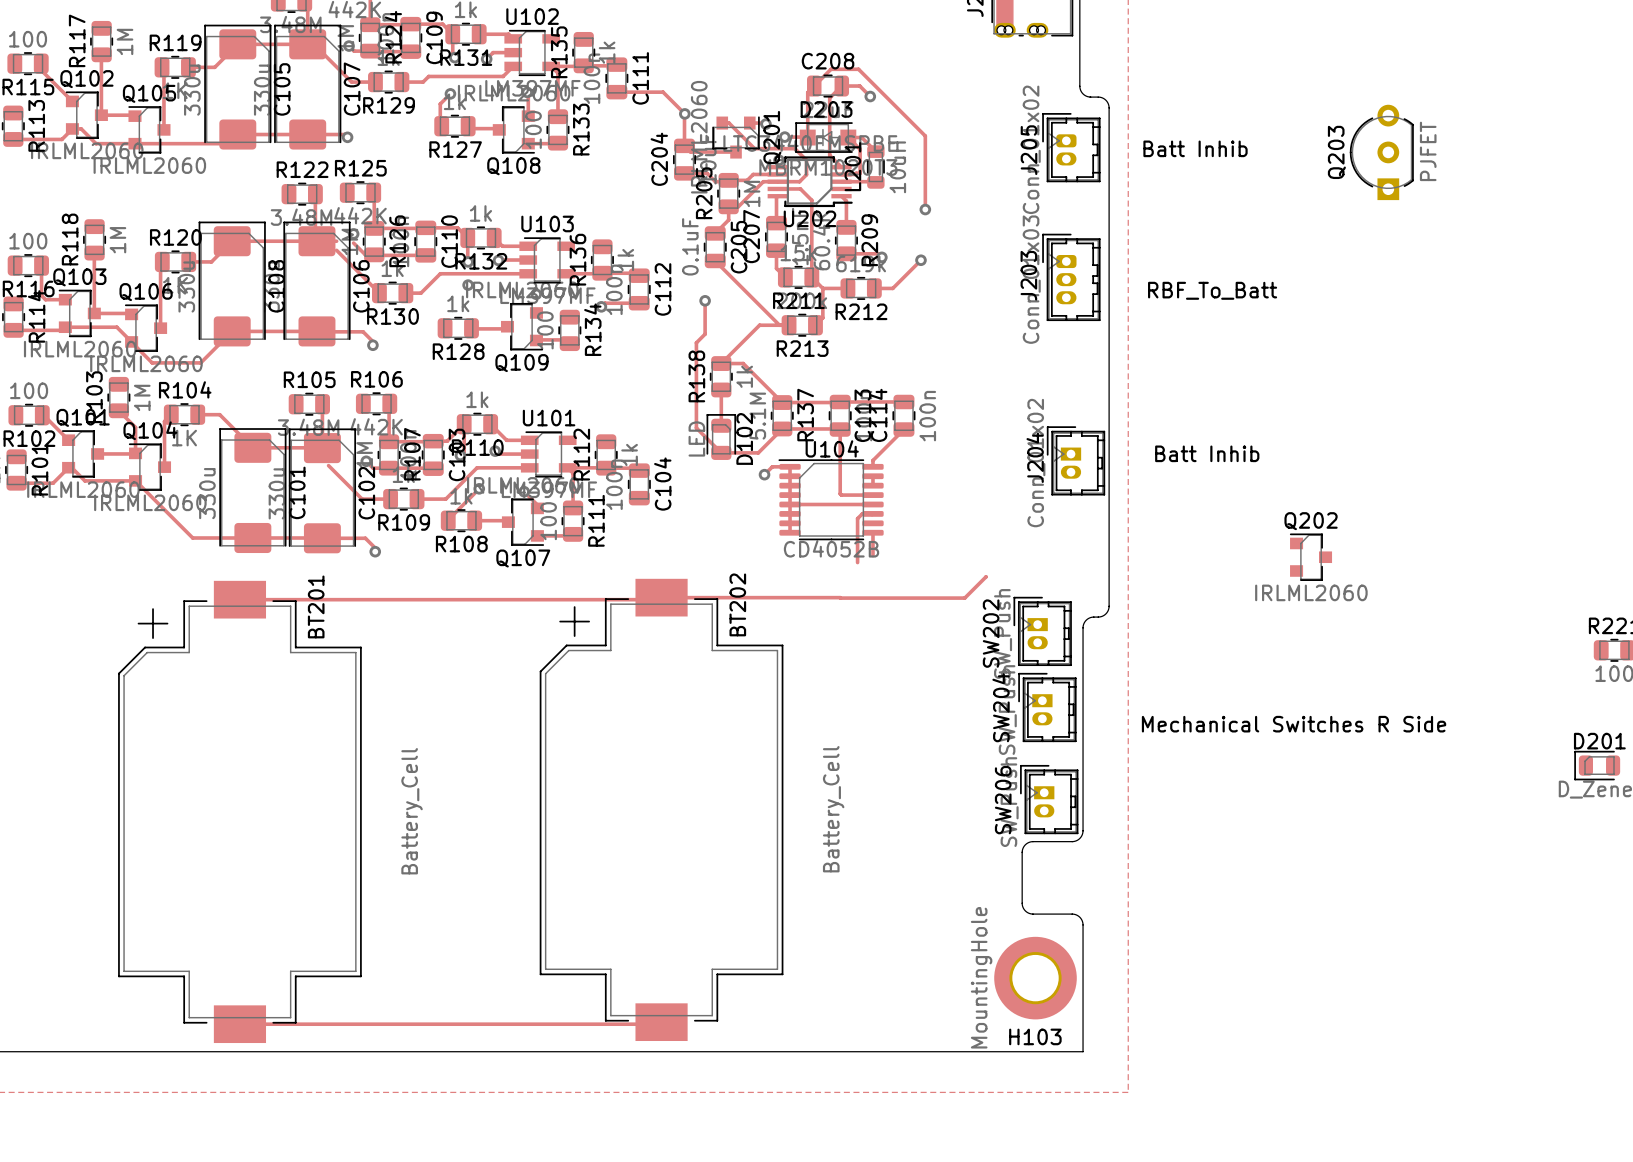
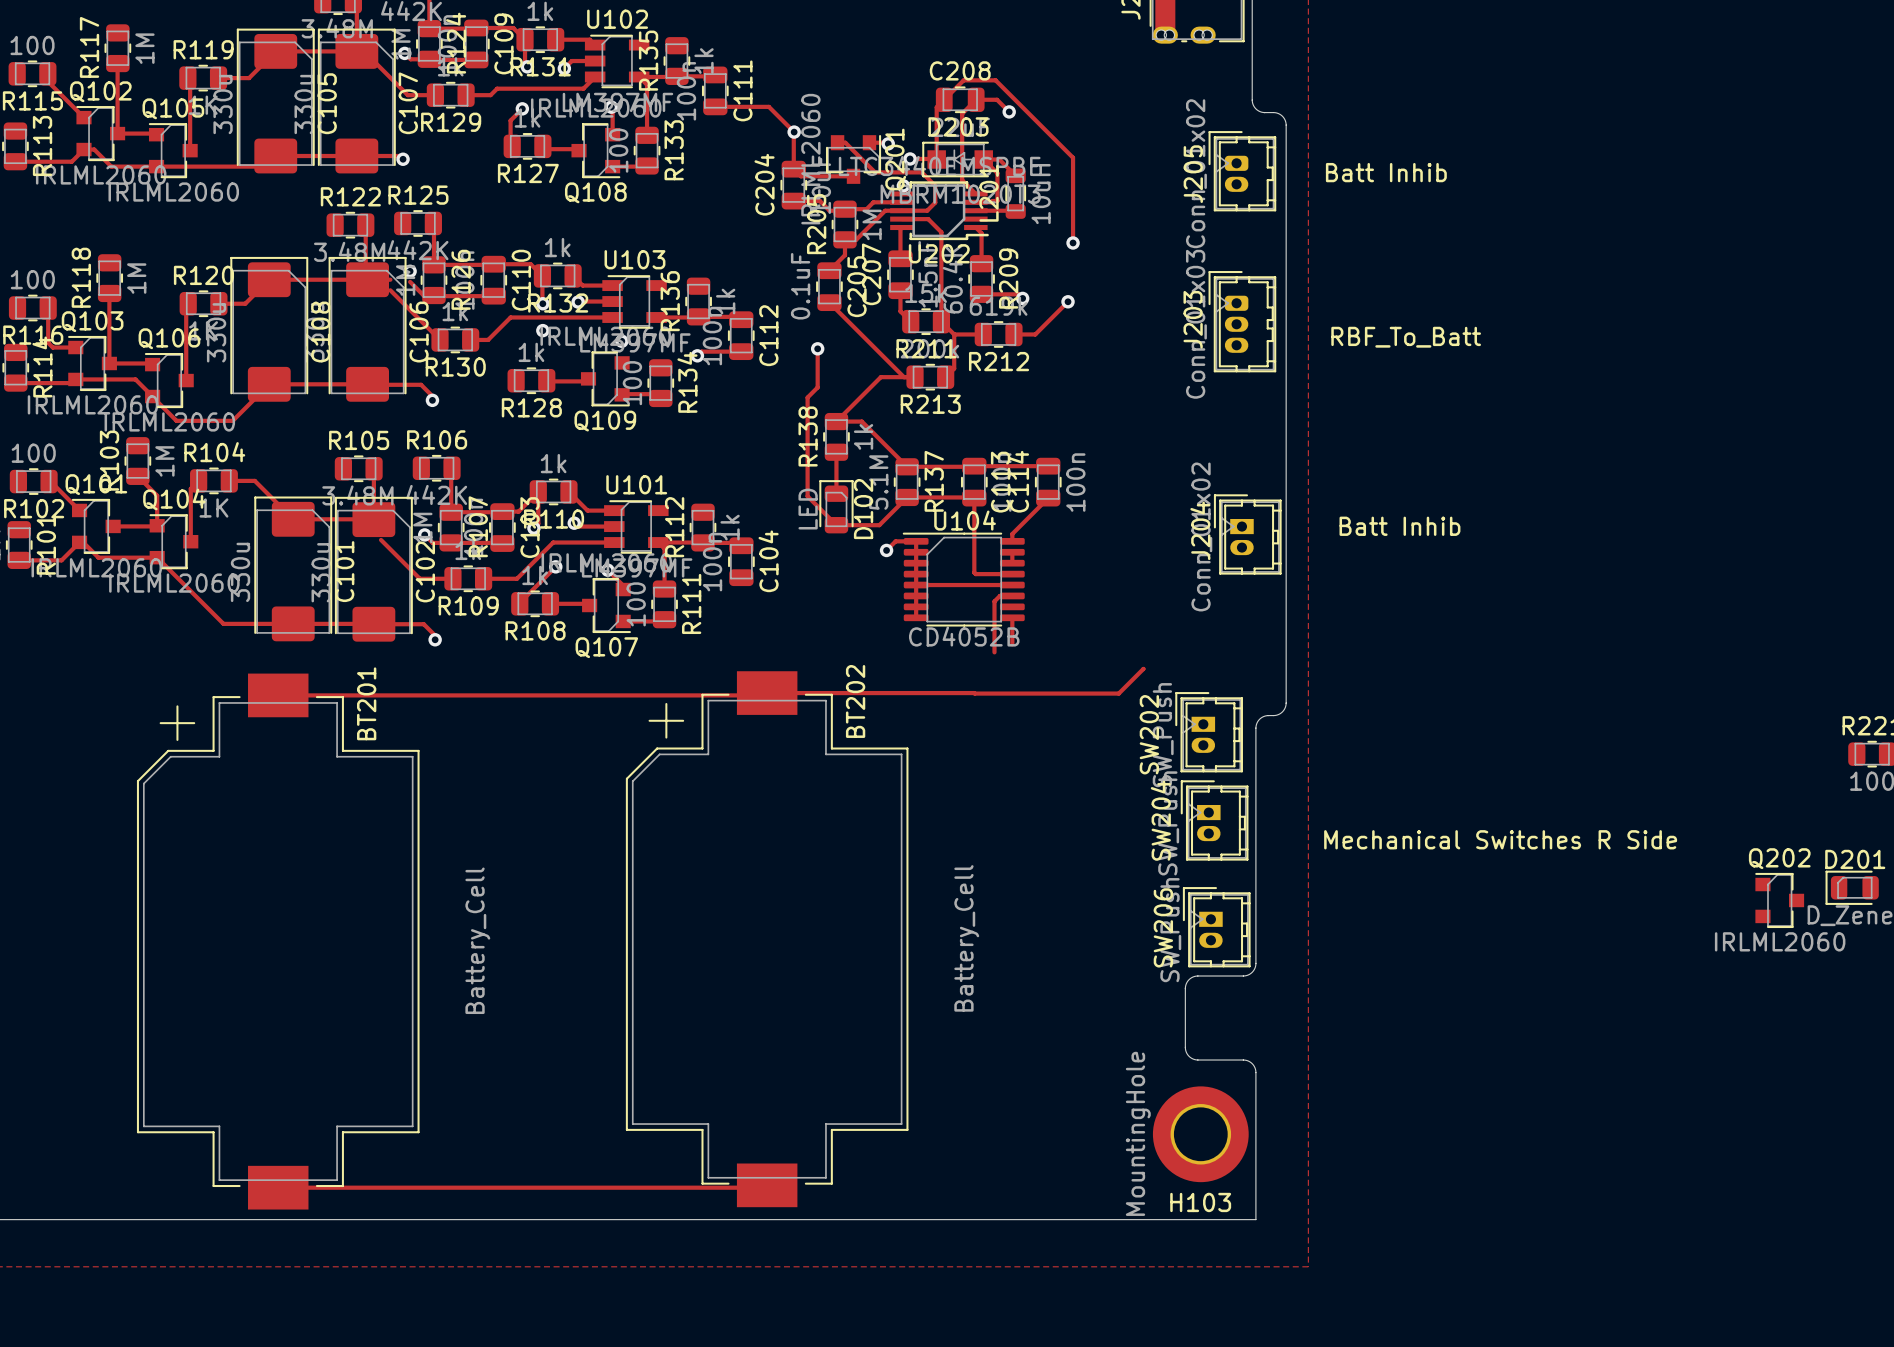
Q203: PJFET (1381, 152) -> none
Q202 position: (1310, 557) -> (1779, 900)

